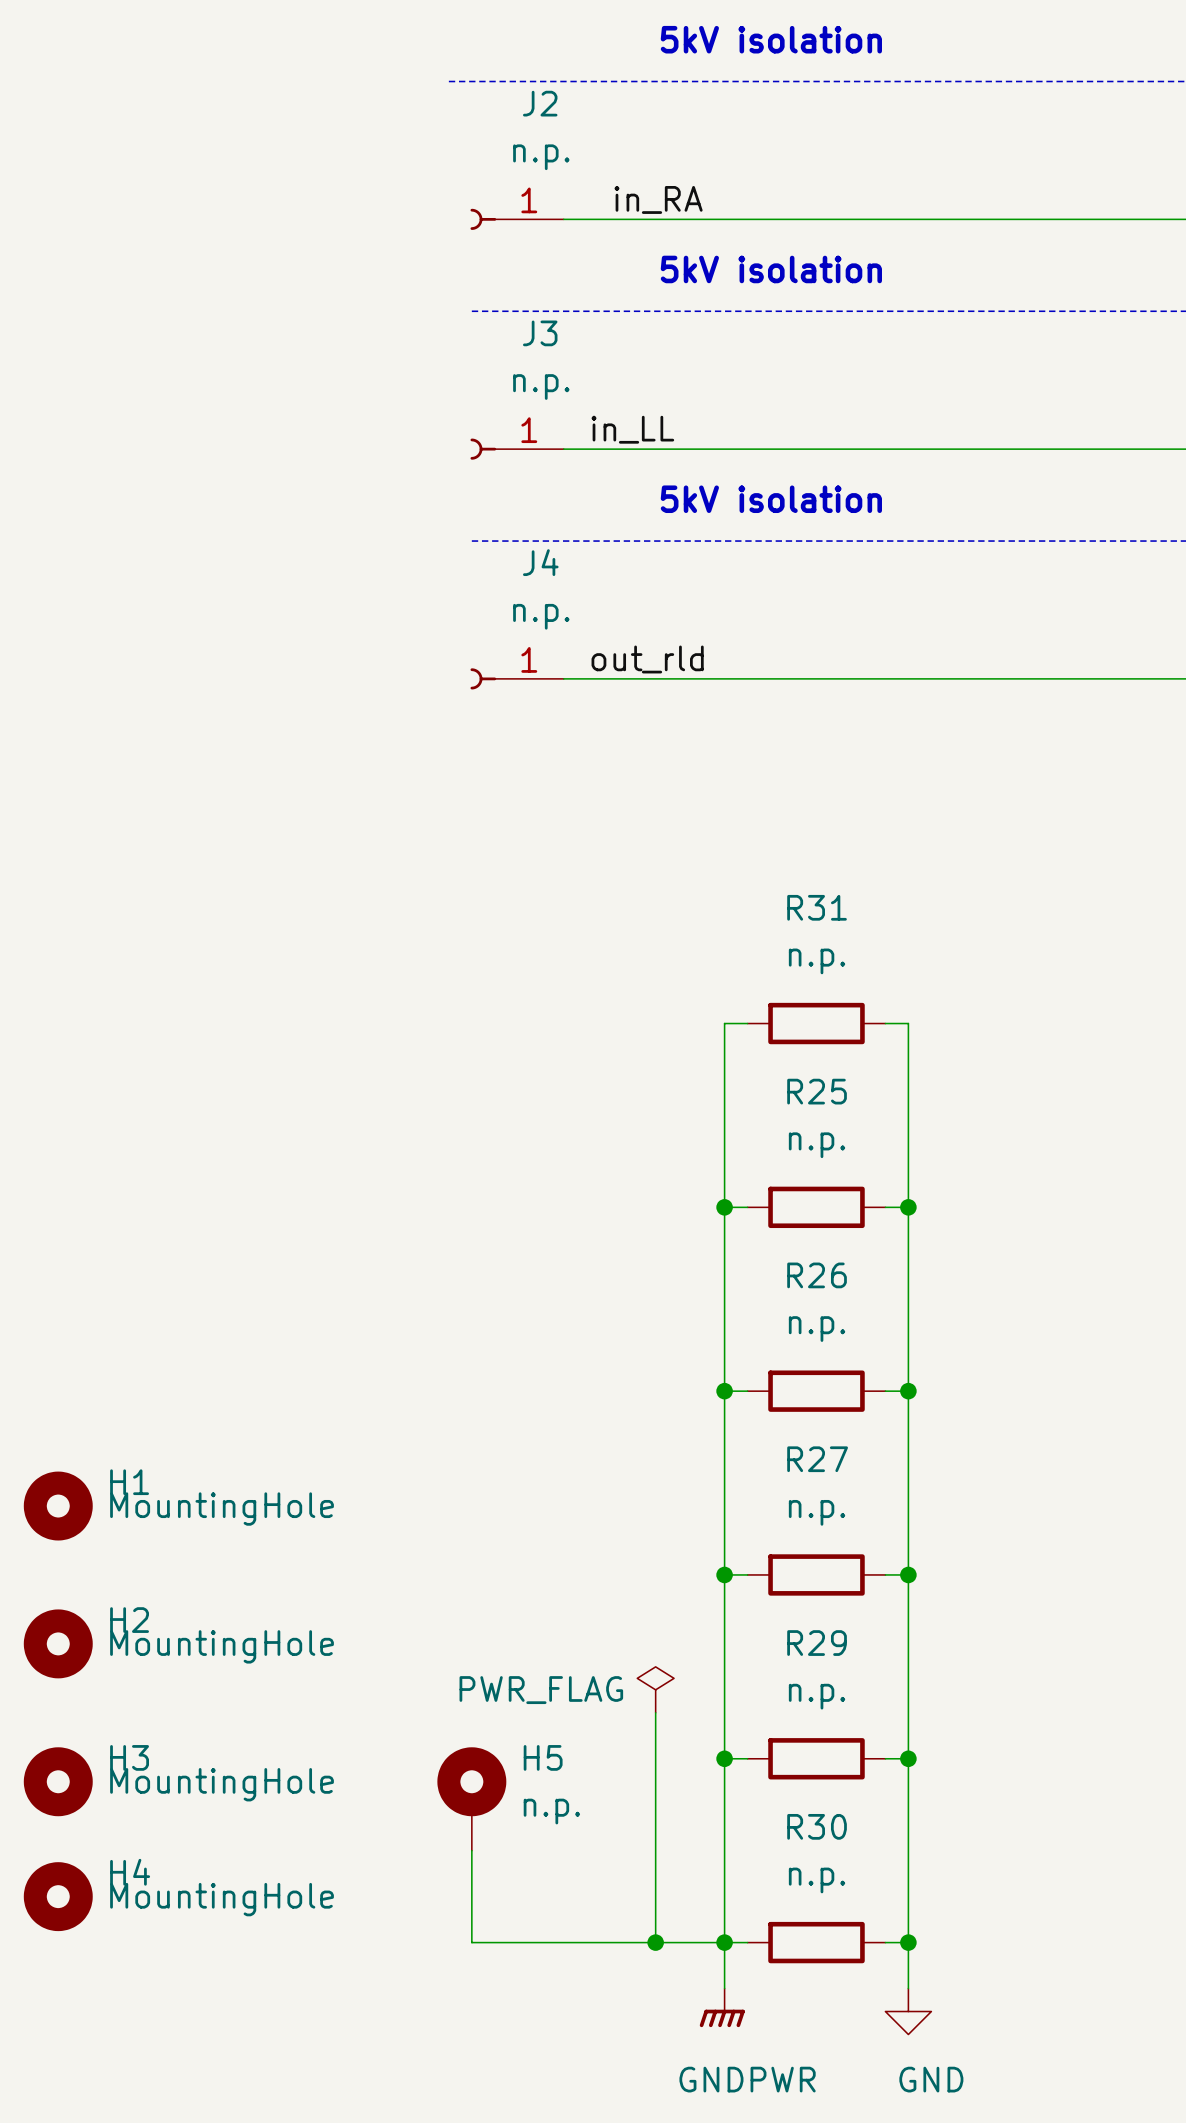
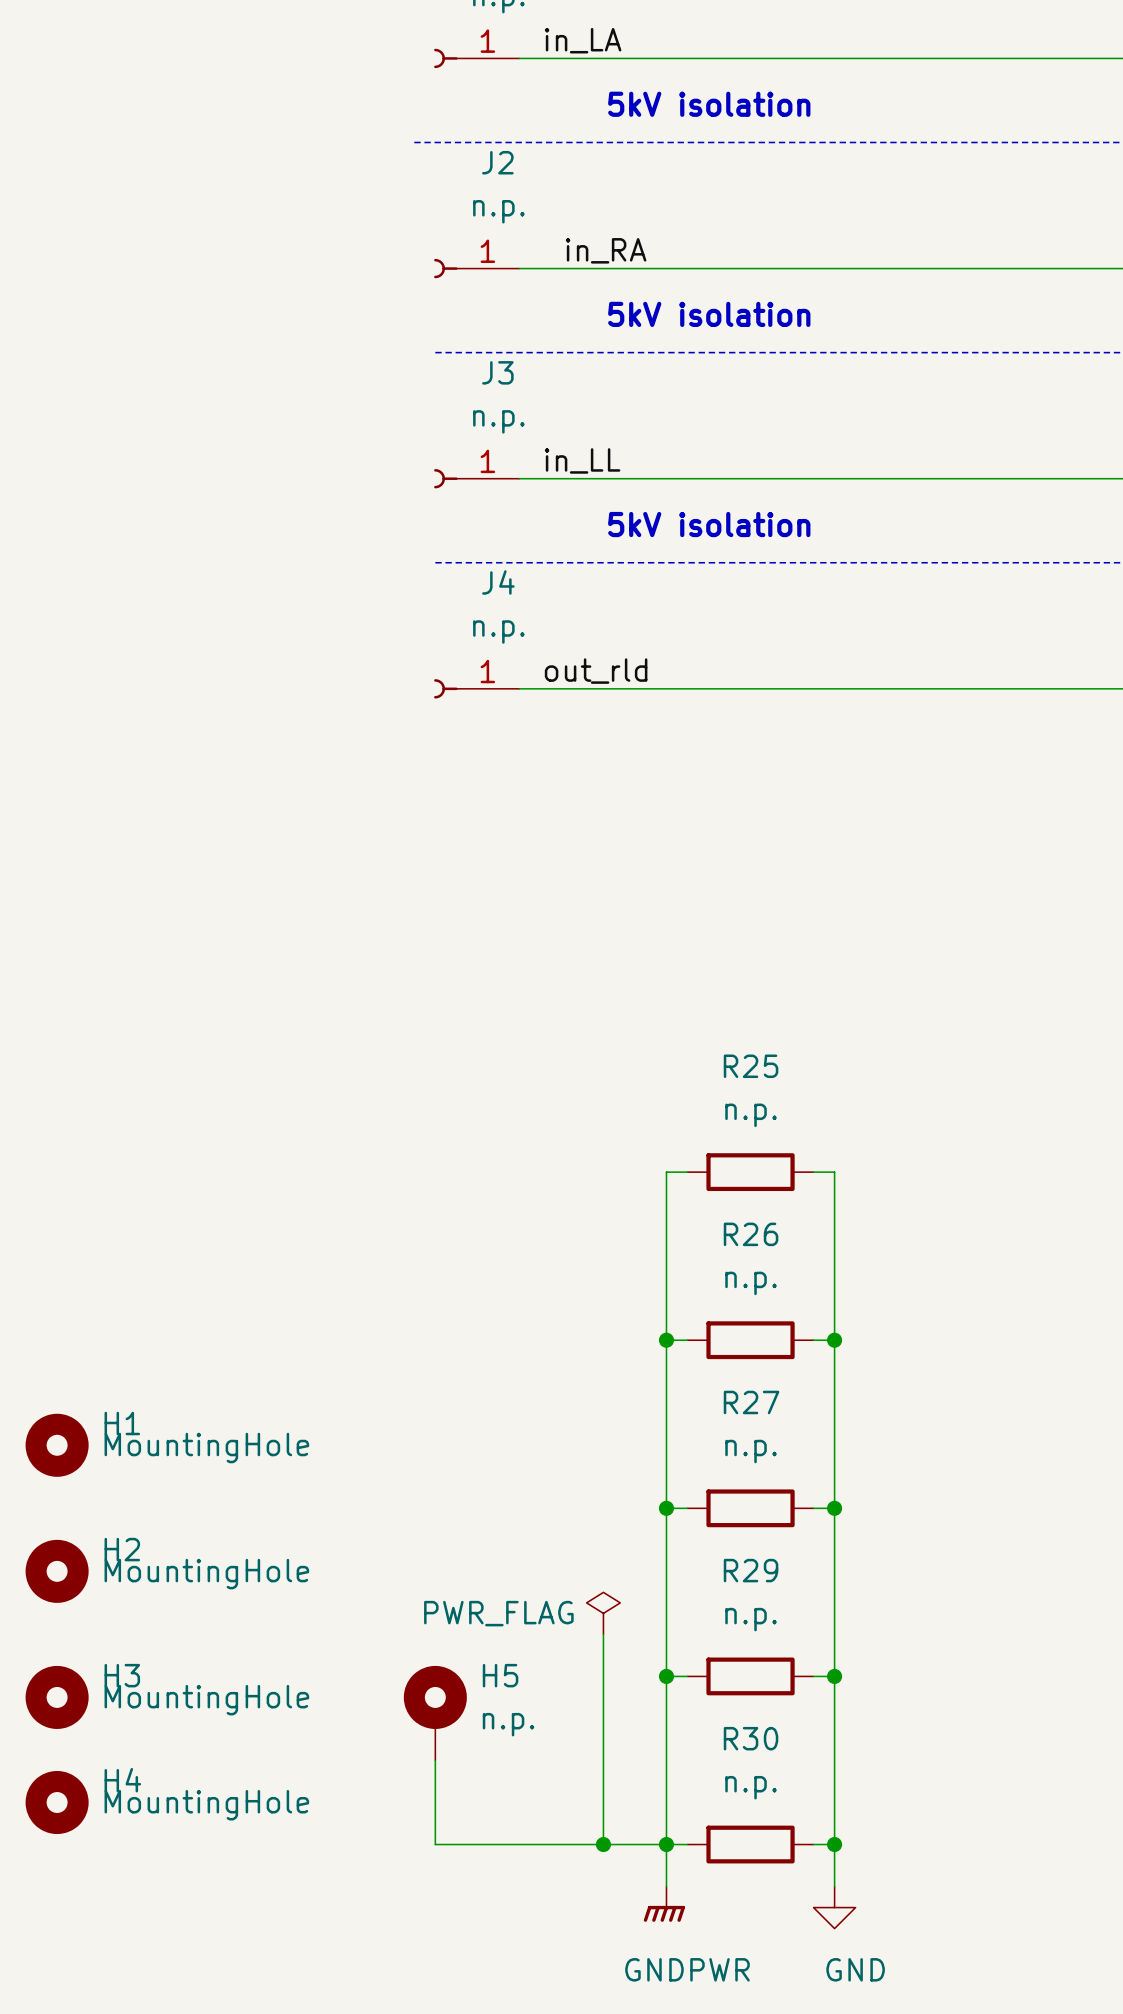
wire: (747, 1023) (724, 1023) (724, 1207) -> none
R31: n.p. (816, 1023) -> none
wire: (885, 1023) (908, 1023) (908, 1207) -> none
junction: (724, 1207) -> none
junction: (908, 1207) -> none

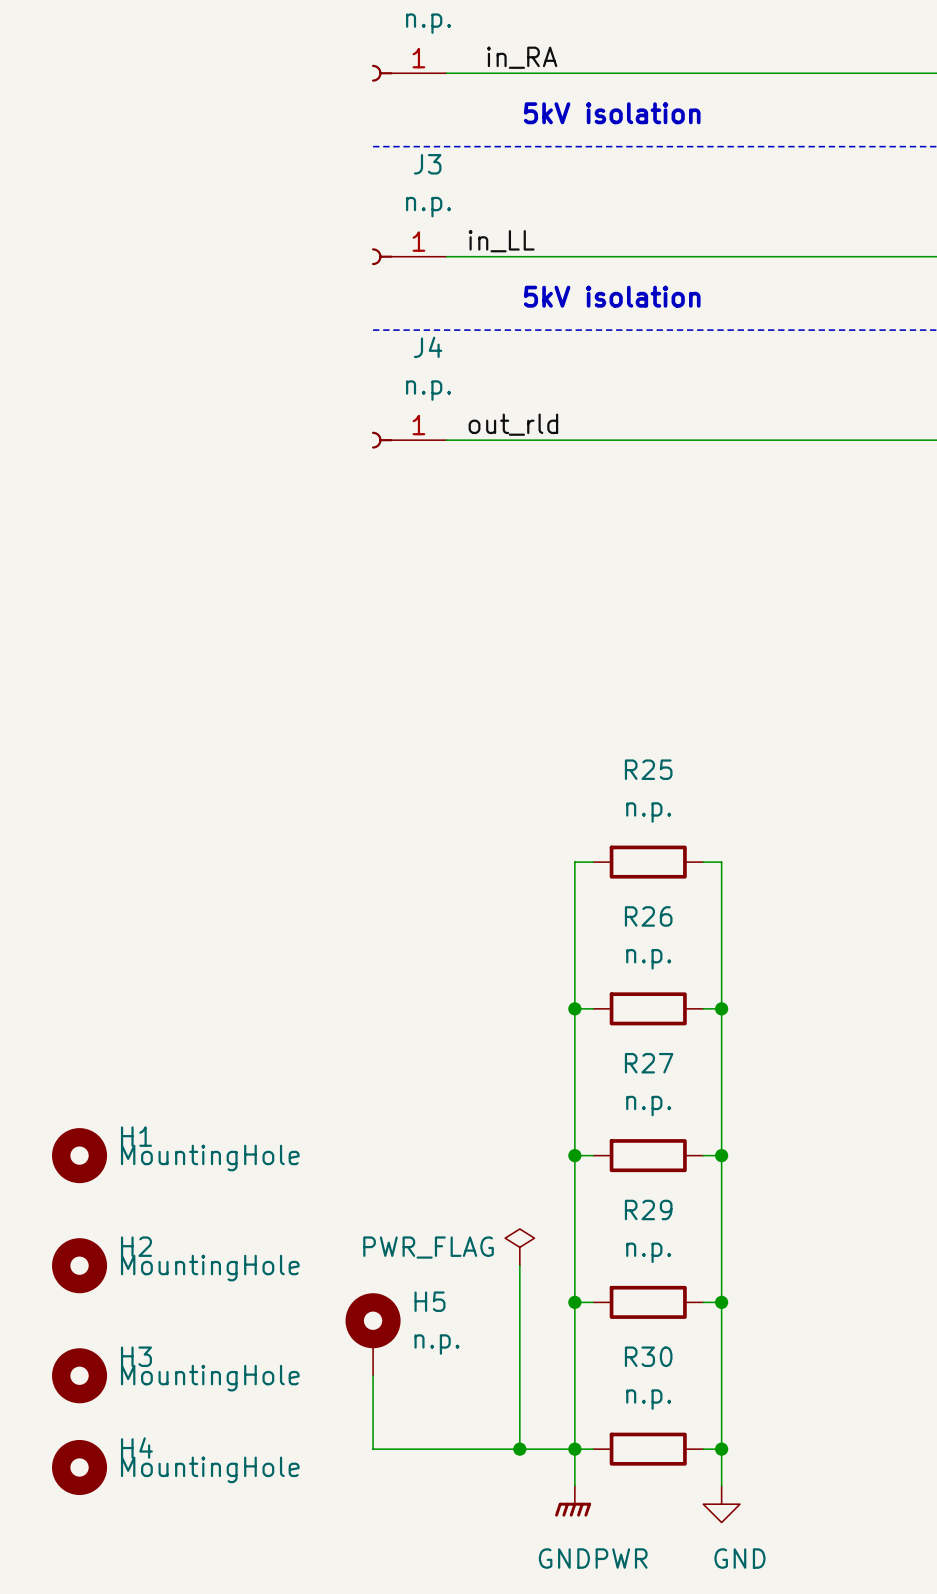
H1 position: (57, 1445) -> (79, 1155)
H2 position: (57, 1571) -> (79, 1265)
H3 position: (57, 1697) -> (79, 1375)
H4 position: (57, 1802) -> (79, 1467)

